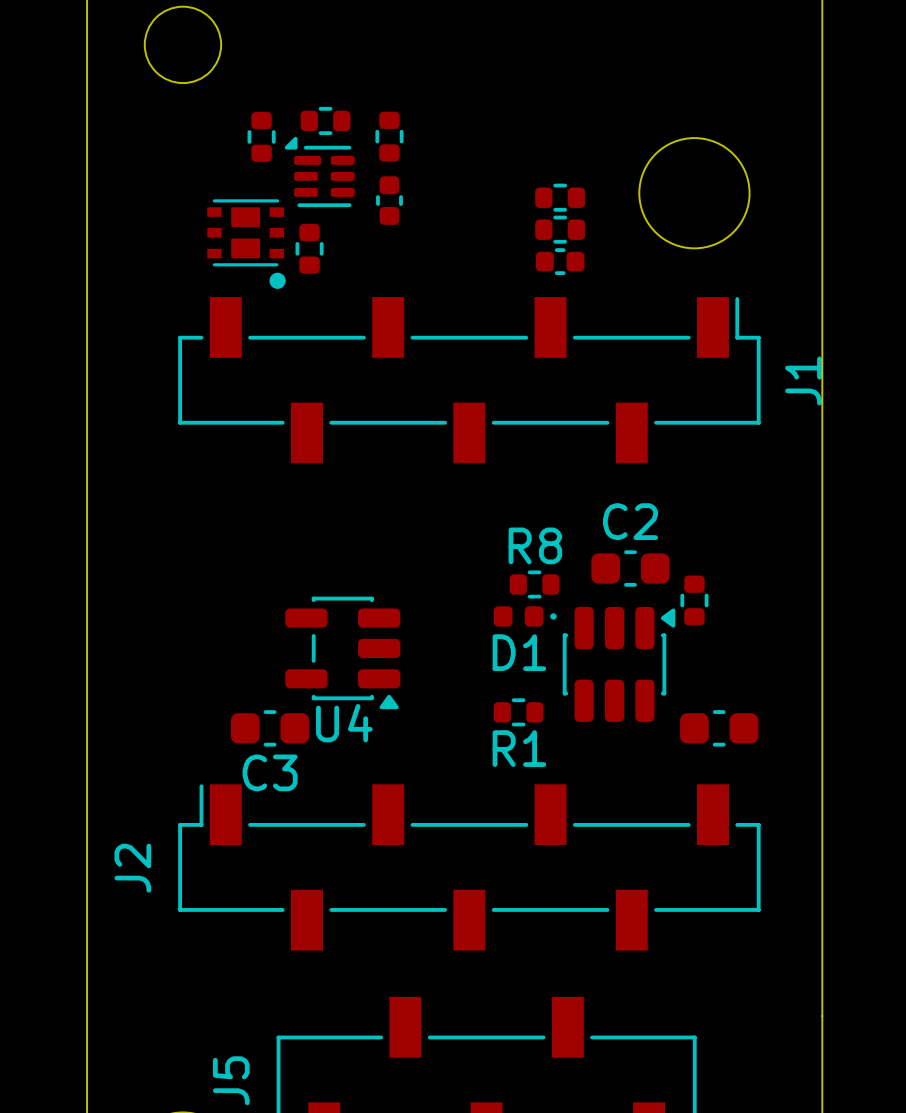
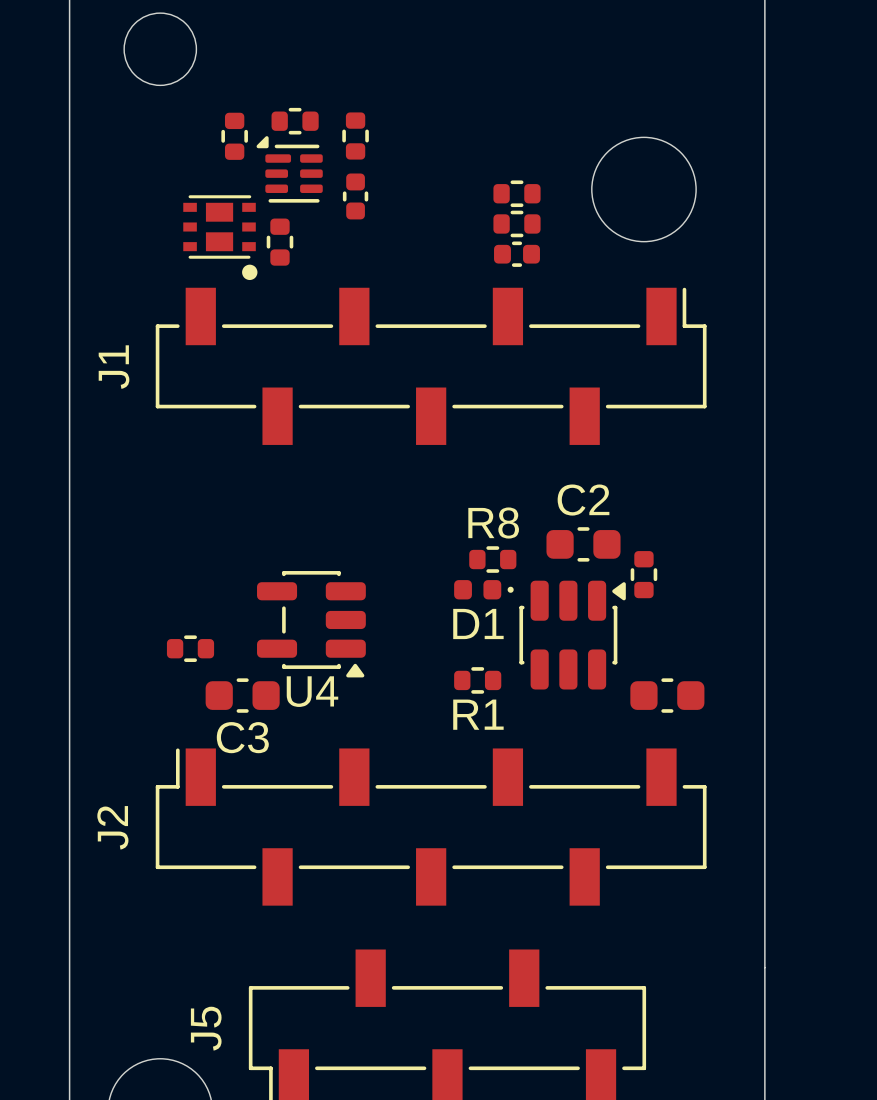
J1 name position: J1 (803, 380) -> J1 (114, 367)
part: none -> (190, 648)

